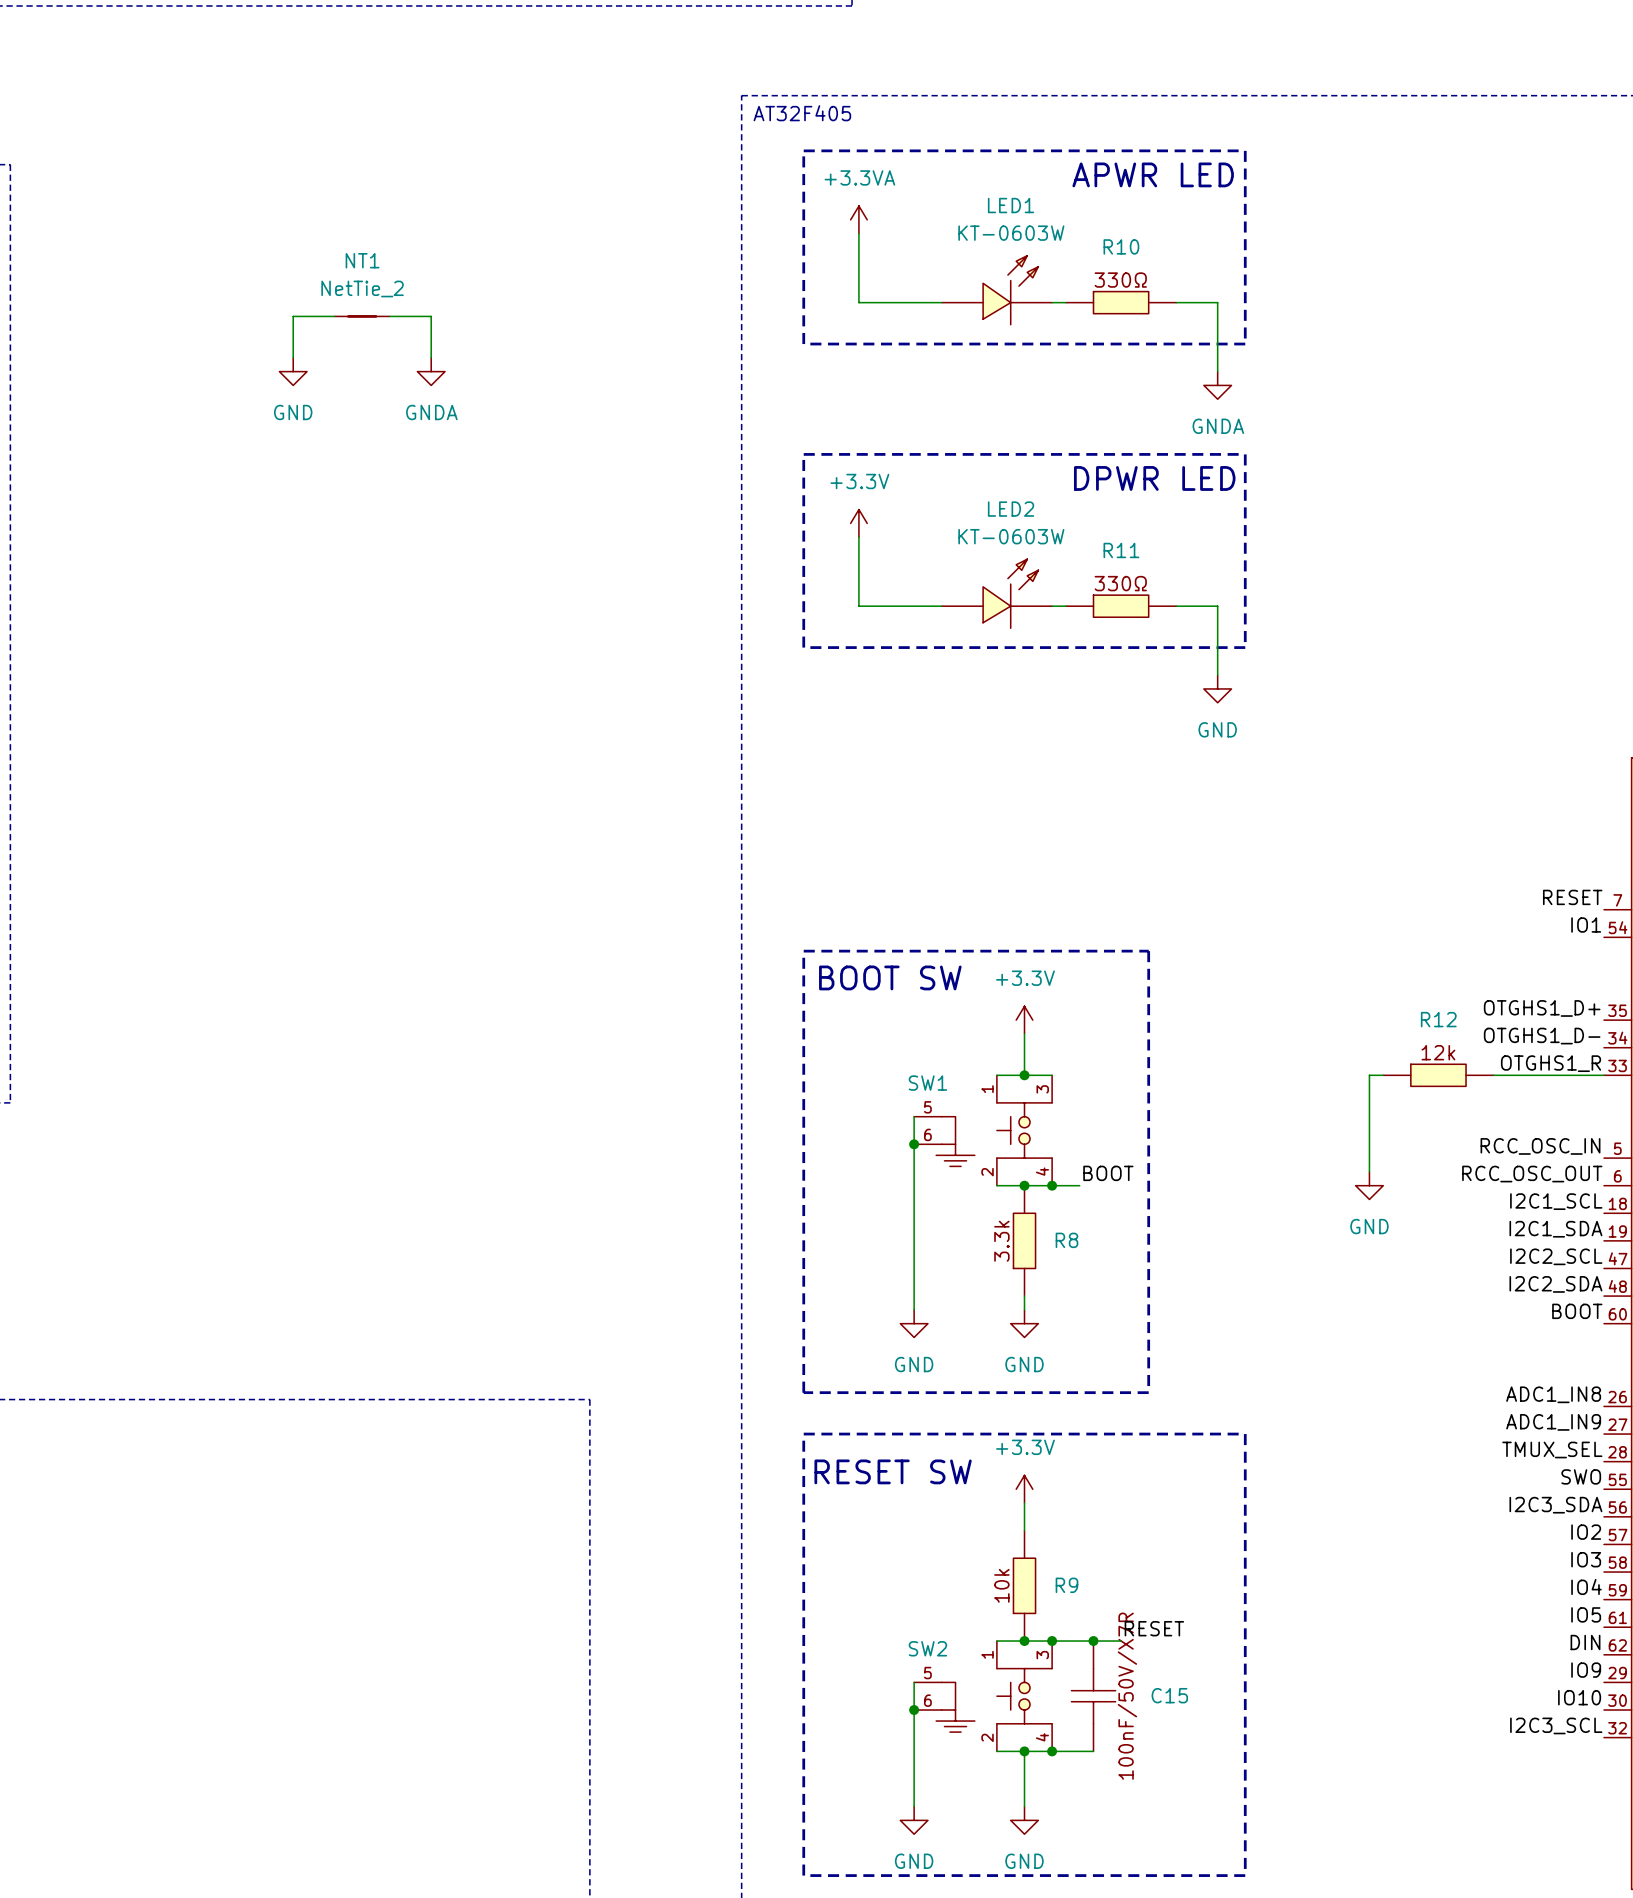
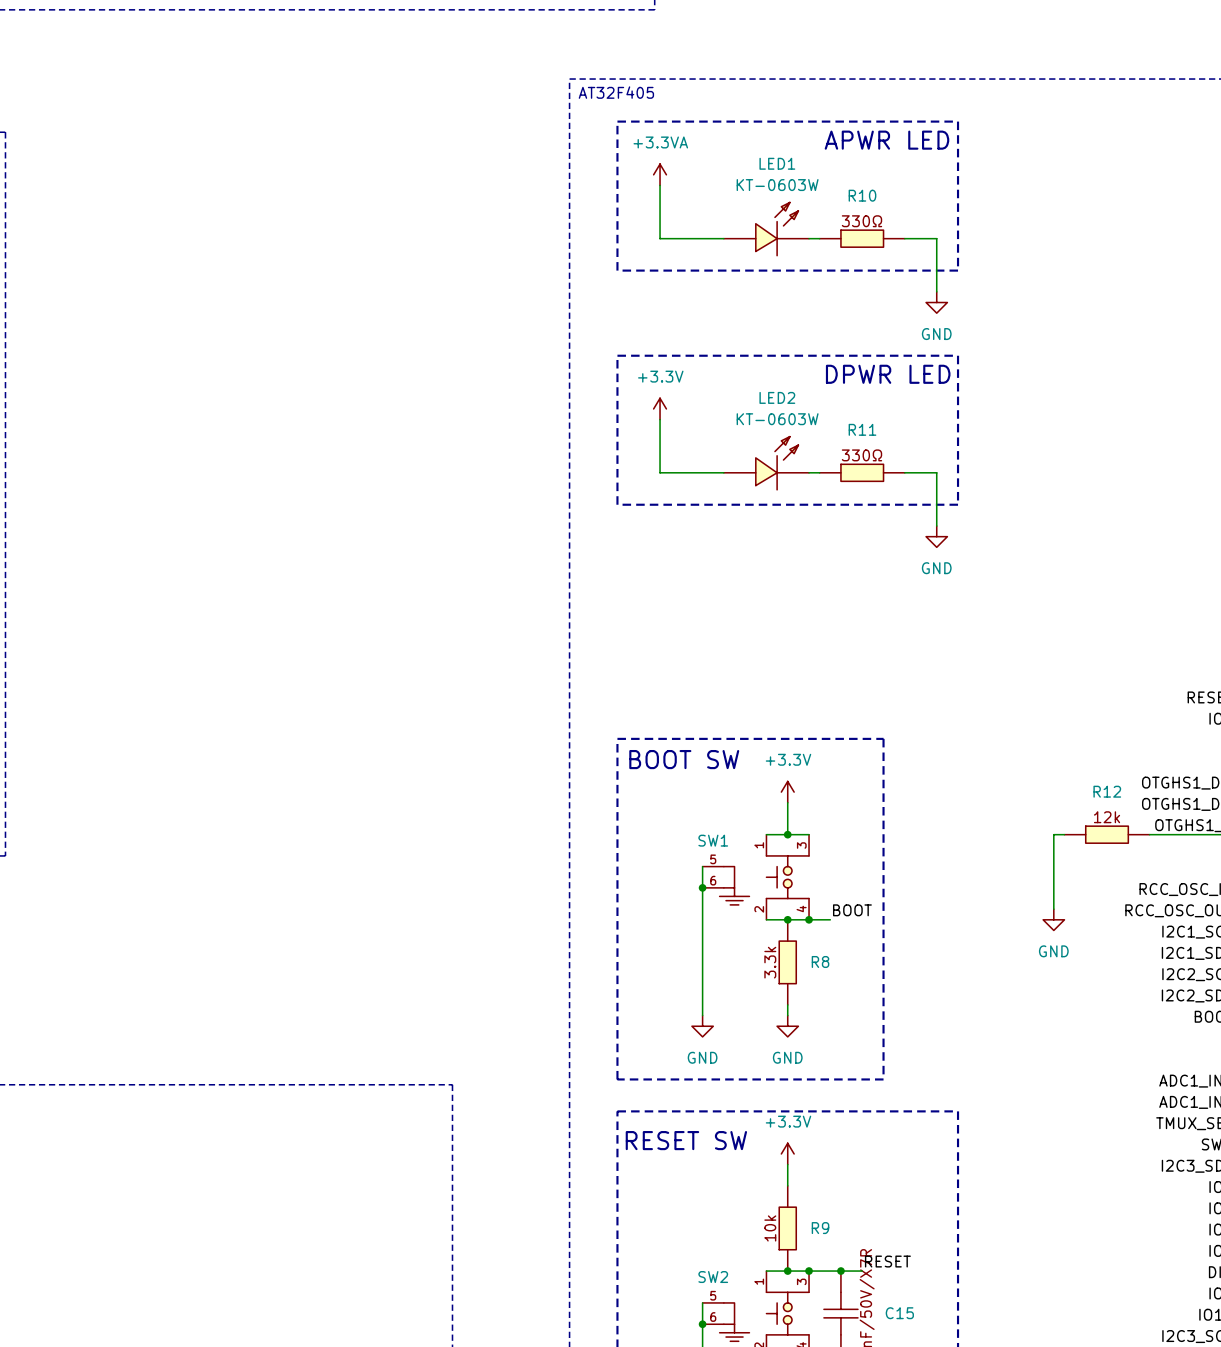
wire: (334, 316) (293, 316) (293, 357) -> none
NT1: NetTie_2 (362, 316) -> none
wire: (389, 316) (431, 316) (431, 357) -> none
power symbol: GND (293, 371) -> none
power symbol: GNDA (431, 371) -> none
power symbol: GNDA (1217, 385) -> GND (936, 302)

